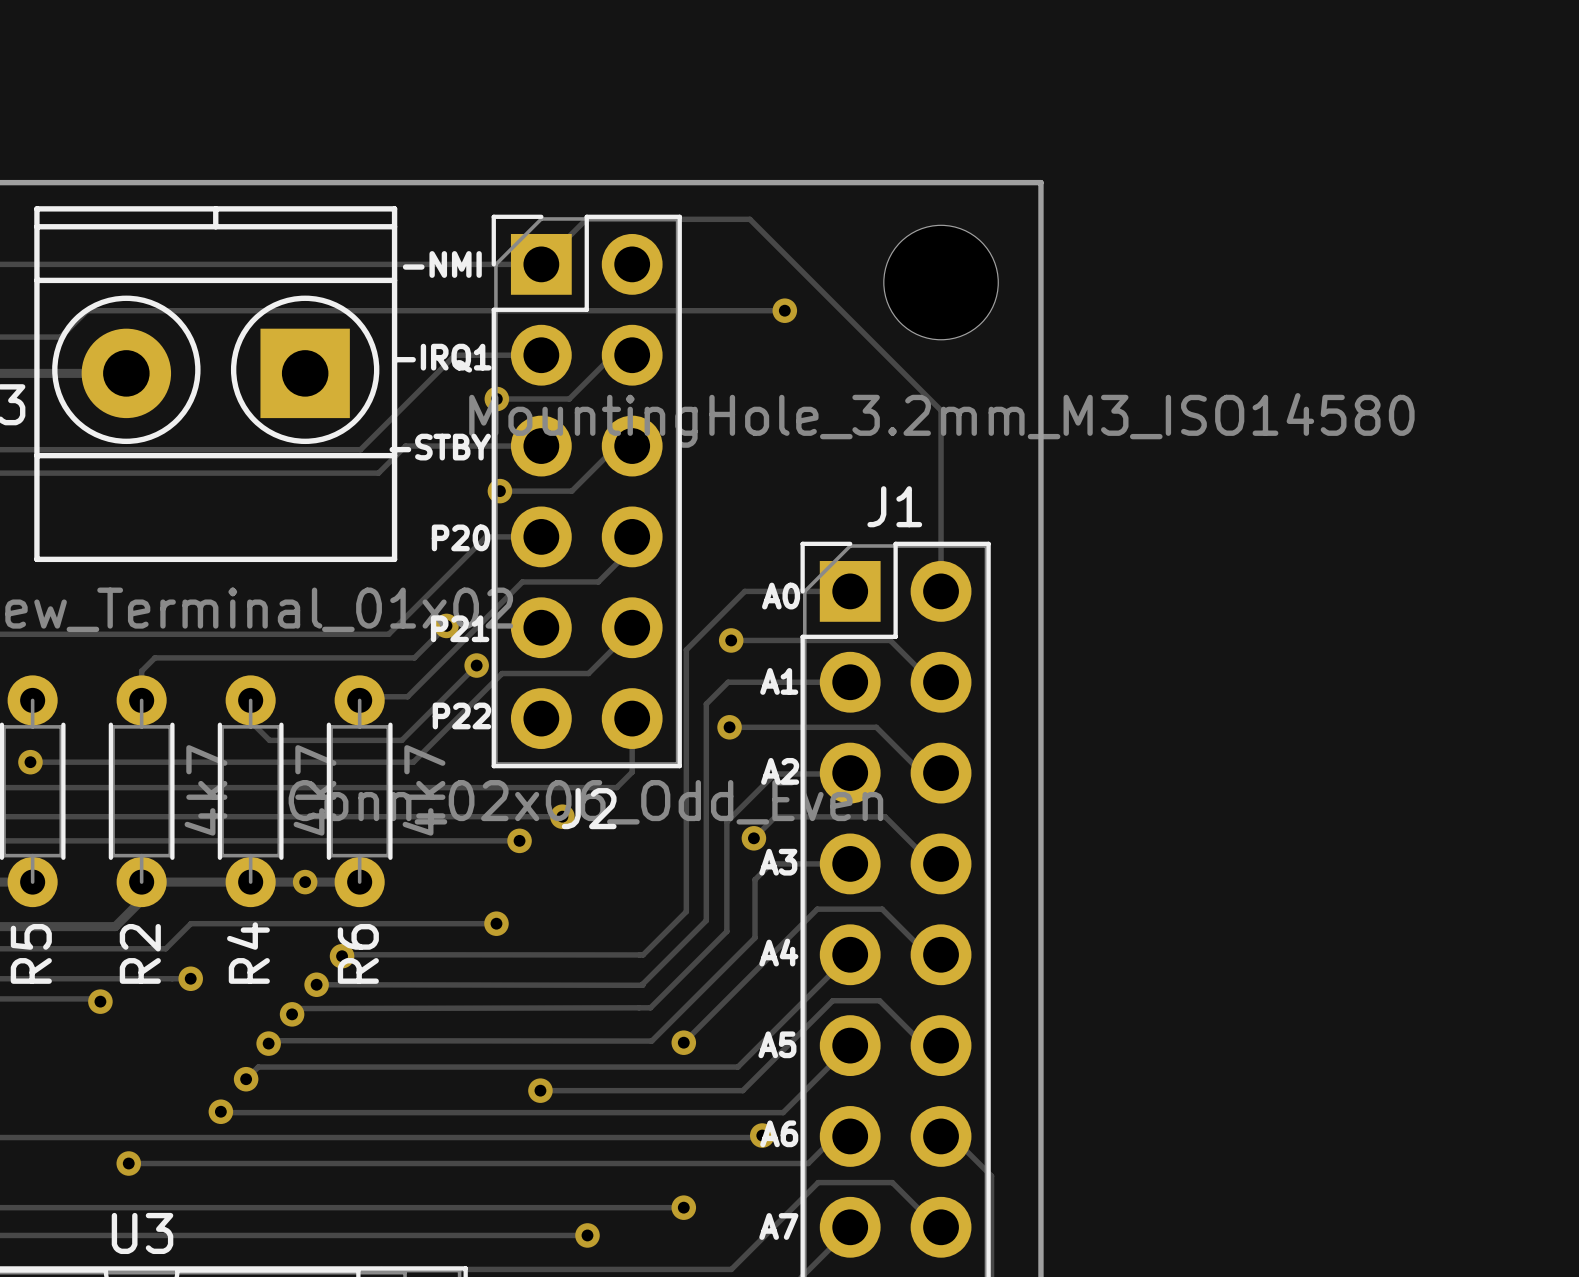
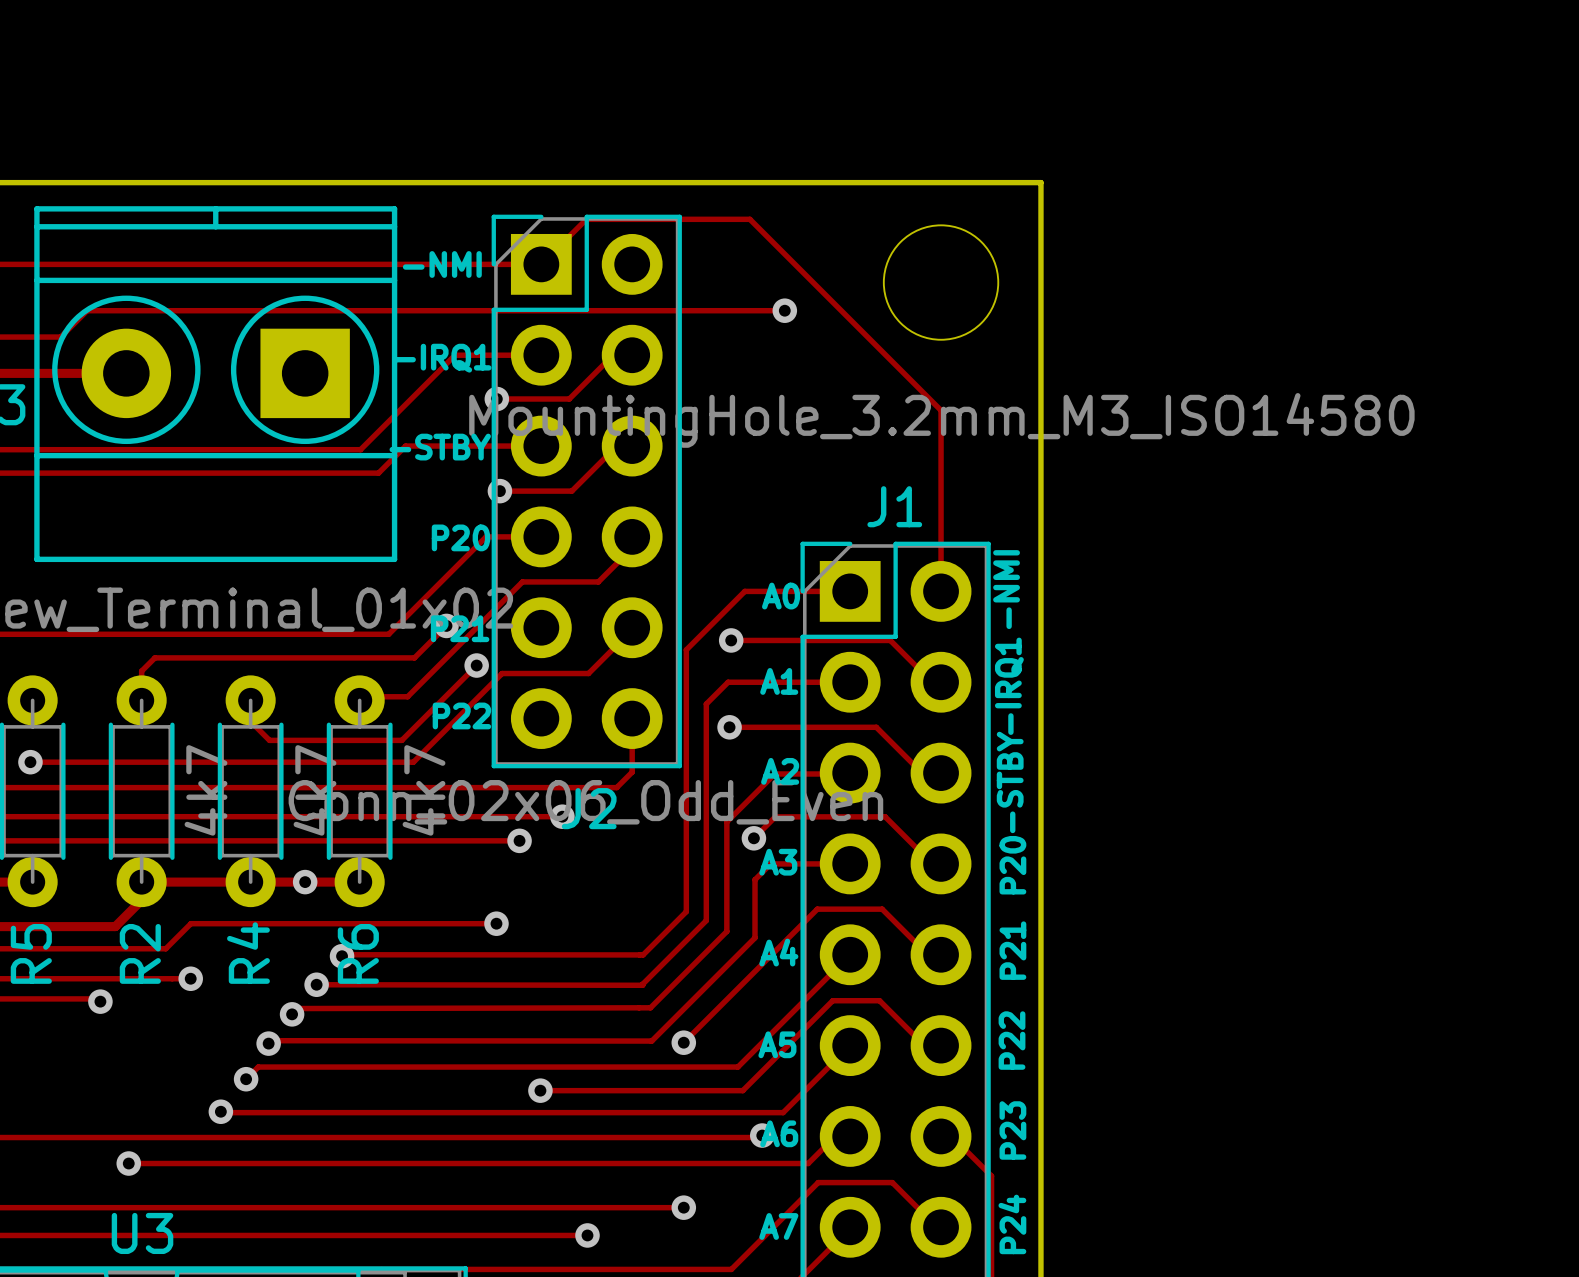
text: none -> -NMI (1006, 589)
text: none -> -IRQ1 (1009, 686)
text: none -> -STBY (1010, 782)
text: none -> P20 (1012, 865)
text: none -> P21 (1012, 950)
text: none -> P22 (1012, 1040)
text: none -> P23 (1012, 1130)
text: none -> P24 (1012, 1224)

